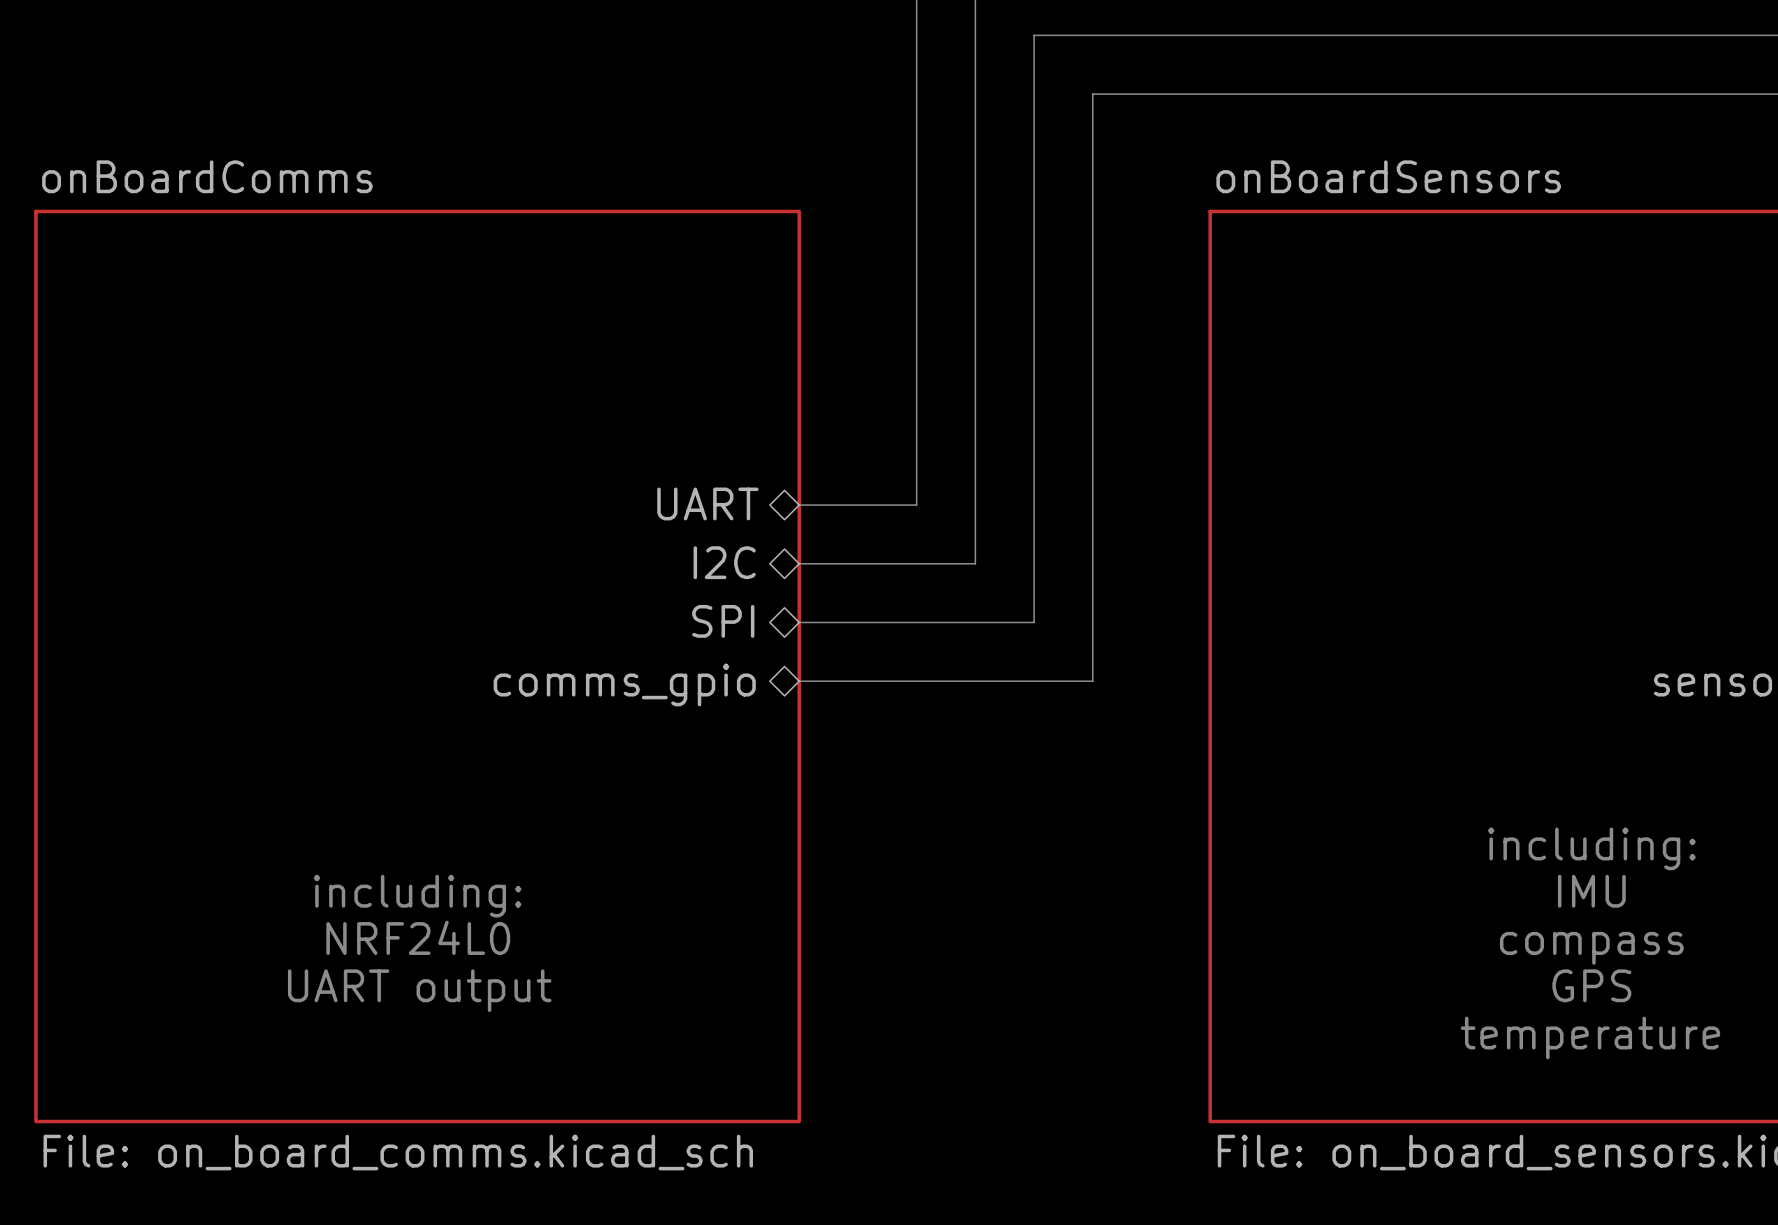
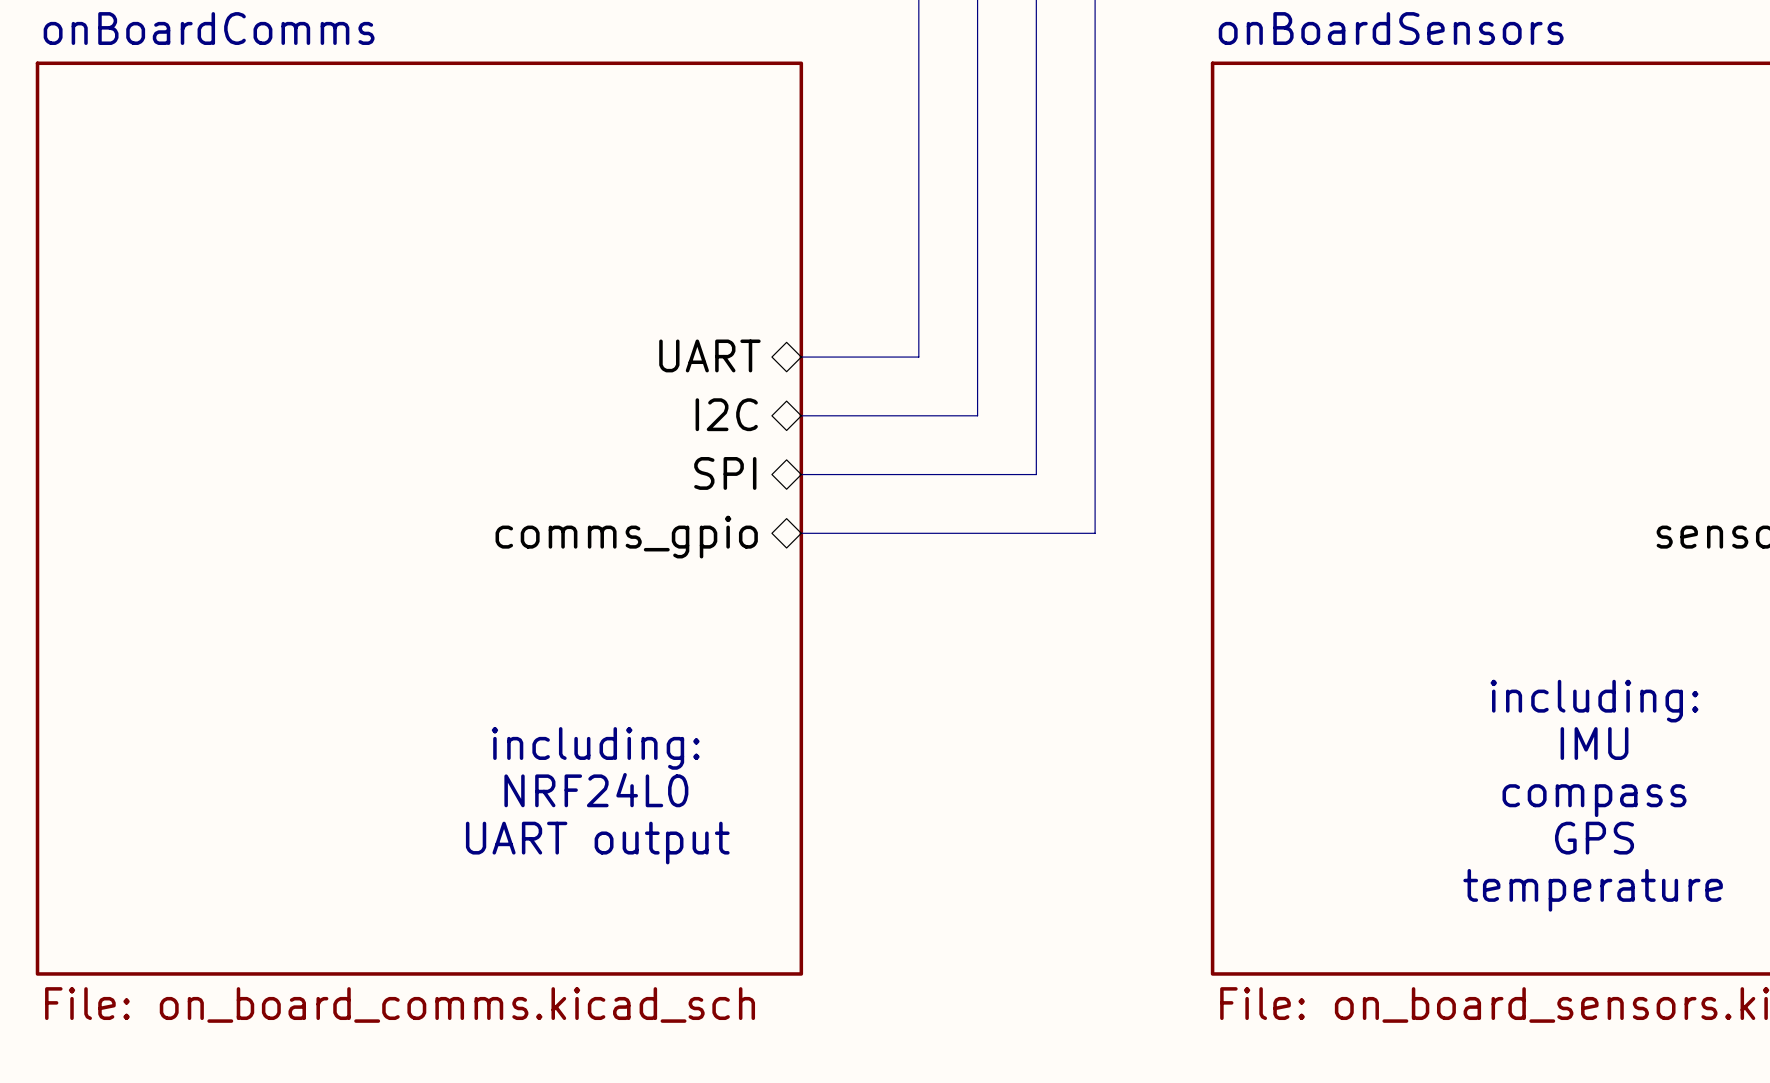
text position: including: (417, 896) -> including: (595, 748)
text position: NRF24L0 (418, 937) -> NRF24L0 (596, 790)
text position: UART output (419, 990) -> UART output (597, 843)

